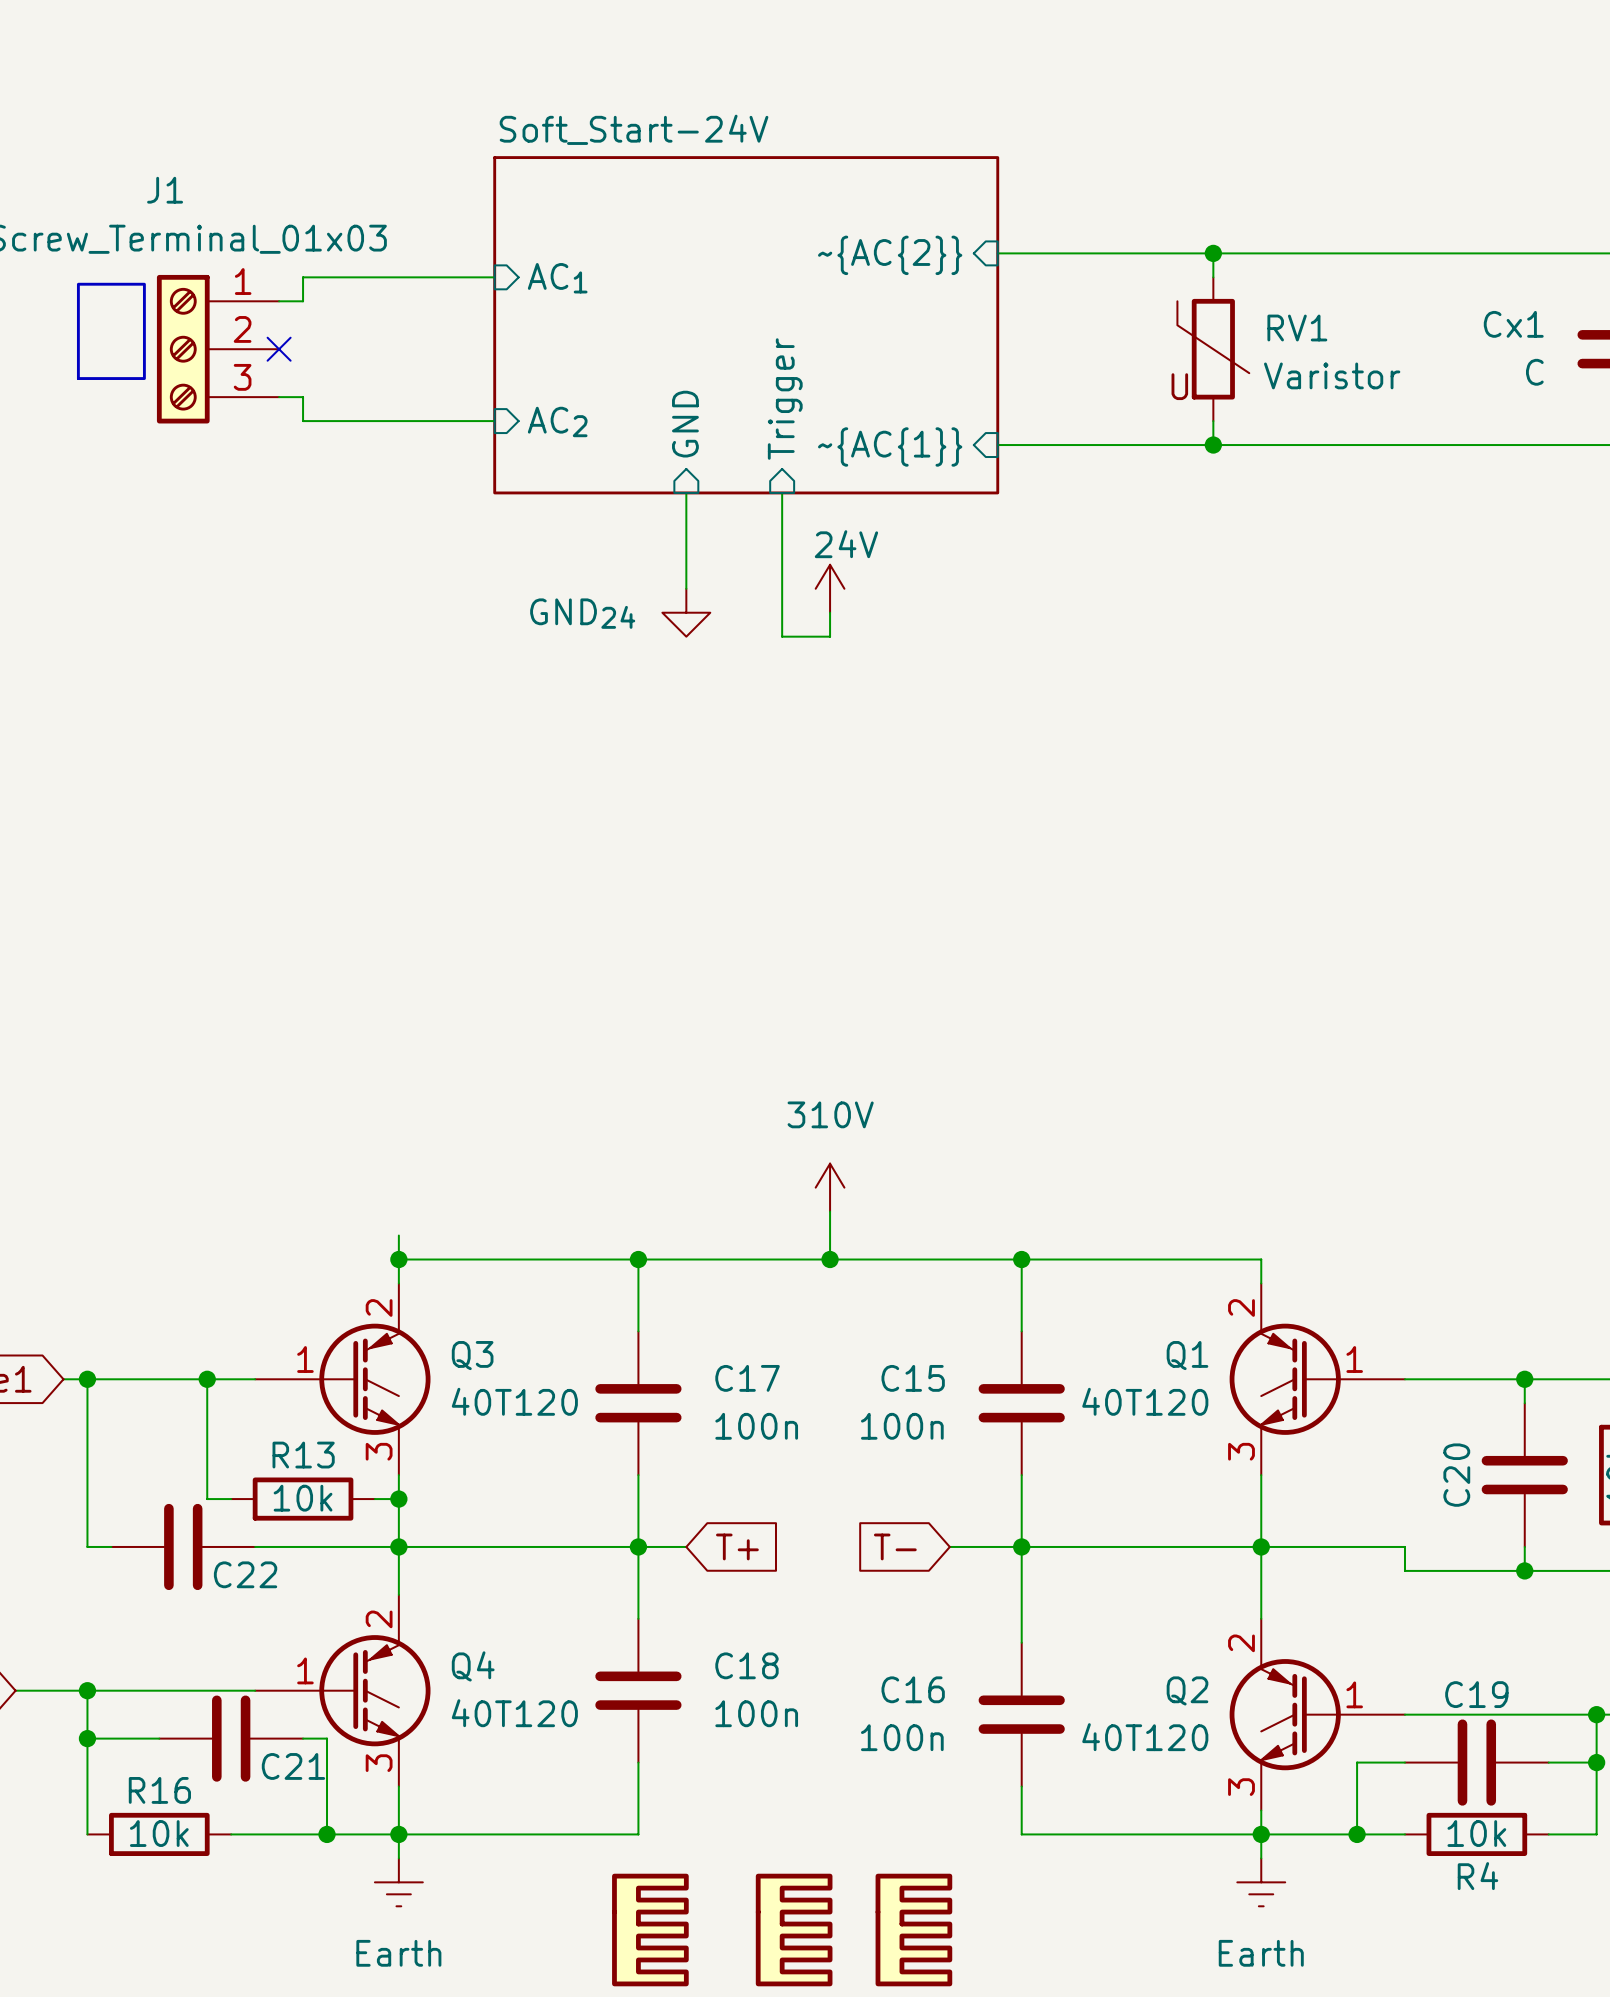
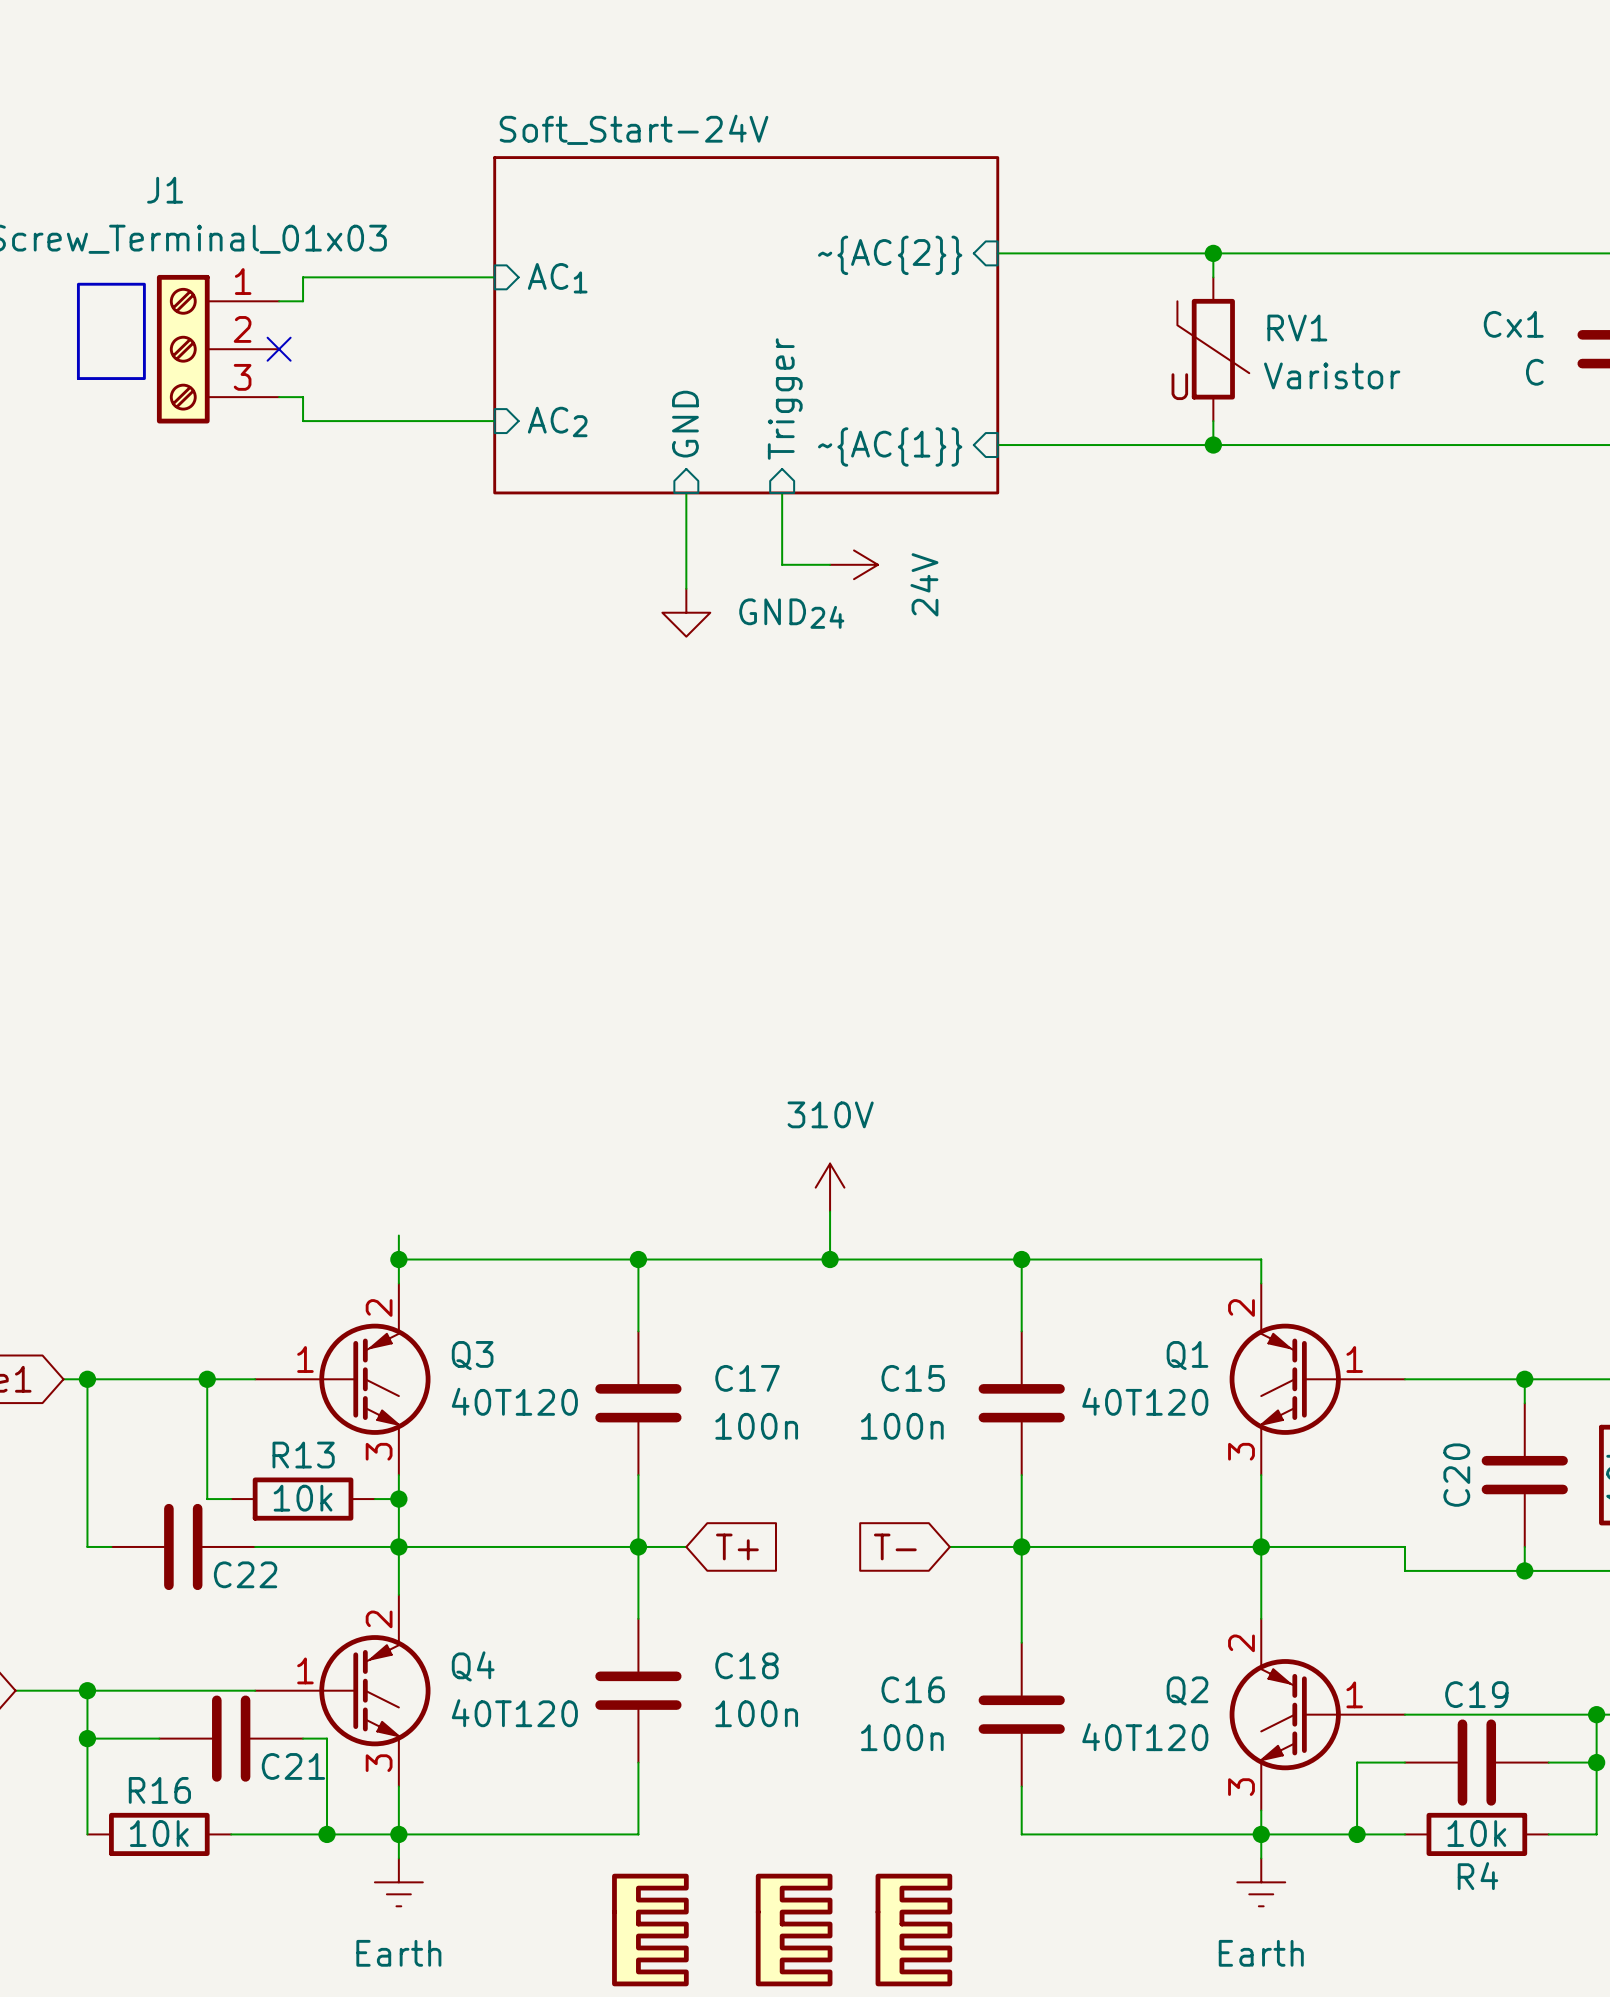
wire: (782, 564) (782, 636) (830, 636) (830, 612) -> (782, 564) (830, 564)
power symbol rotation: 0° (830, 588) -> 90° clockwise (854, 564)
power symbol position: 24V (830, 588) -> 24V (854, 564)
power symbol text position: GND24 (582, 613) -> GND24 (791, 613)

